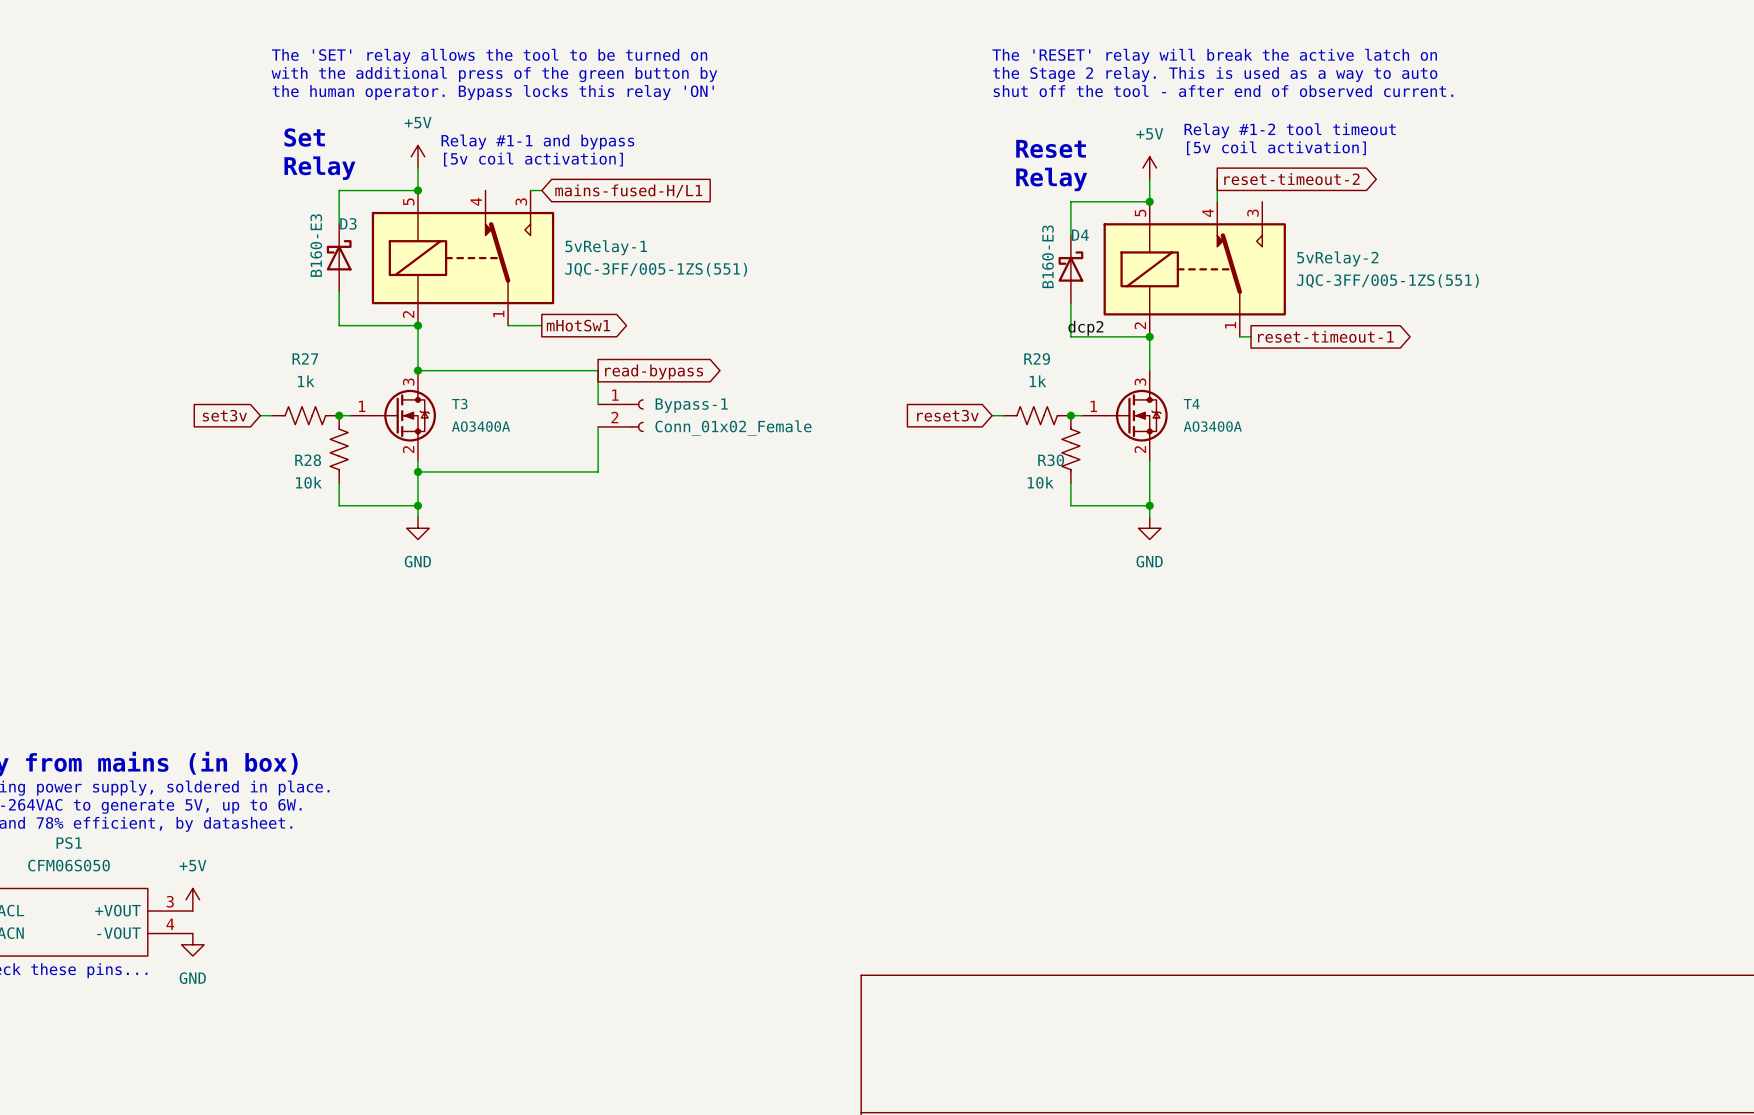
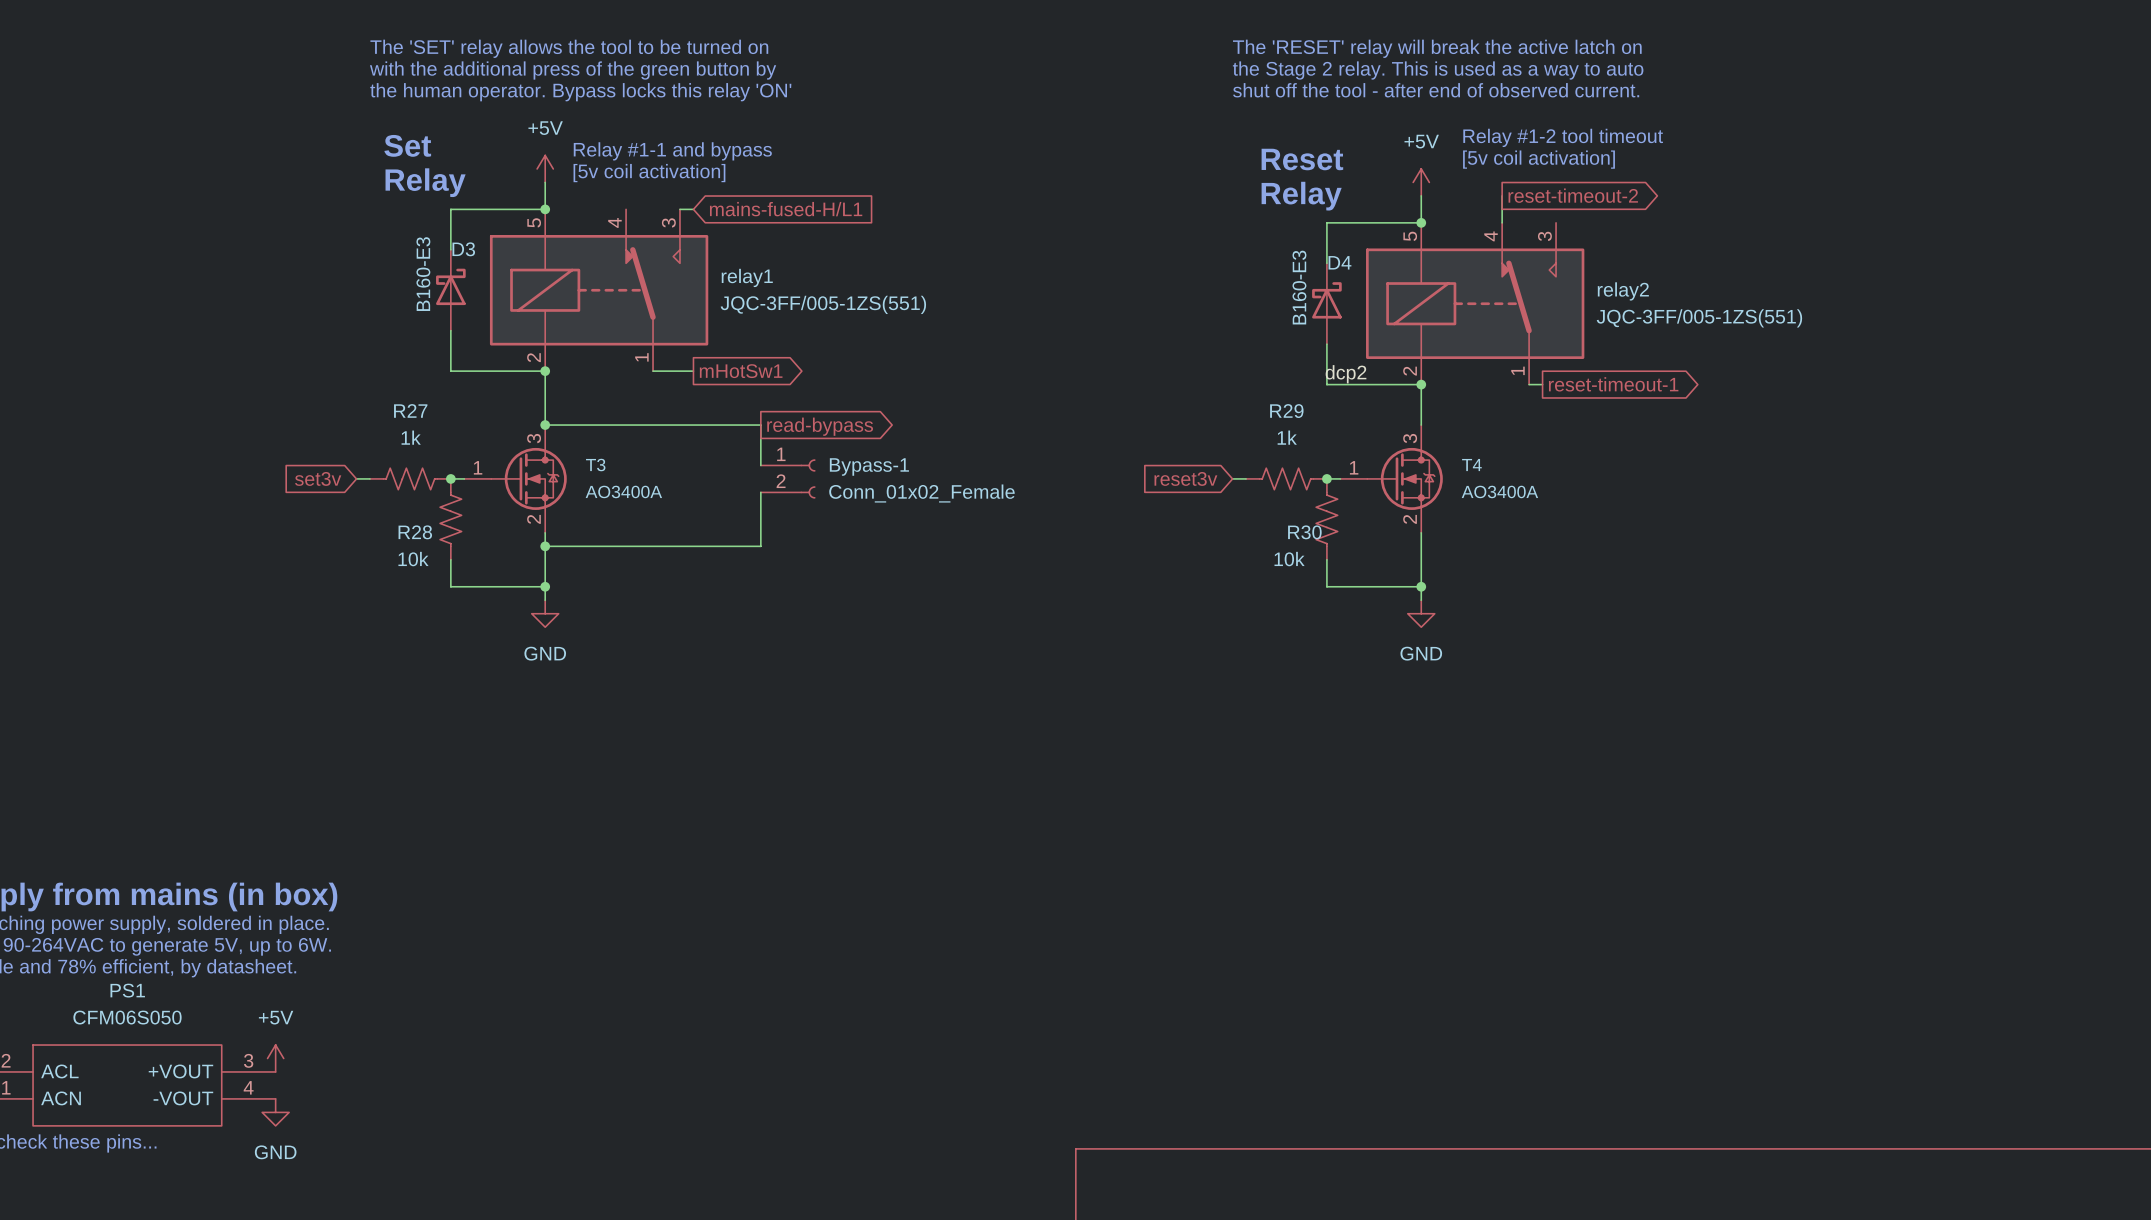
5vRelay-1 name: 5vRelay-1 (606, 247) -> relay1 (747, 277)
5vRelay-2 name: 5vRelay-2 (1337, 258) -> relay2 (1623, 291)

